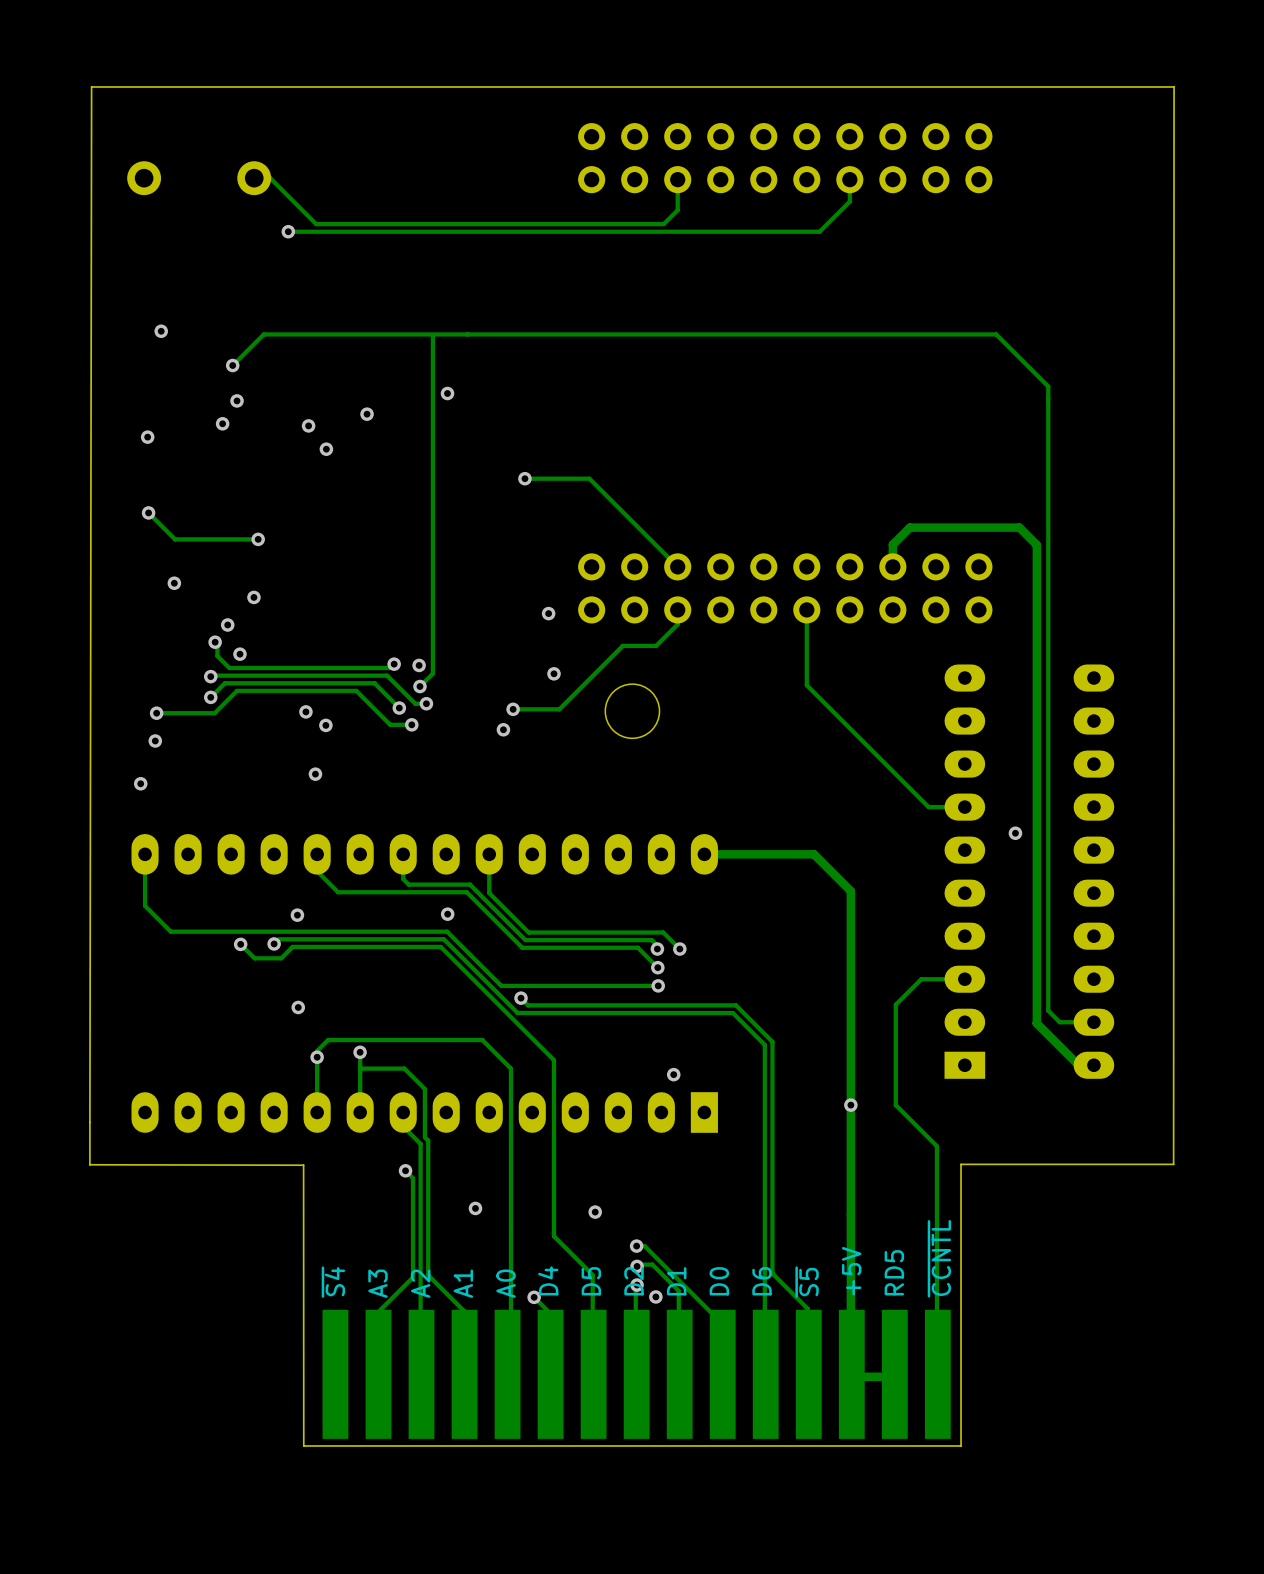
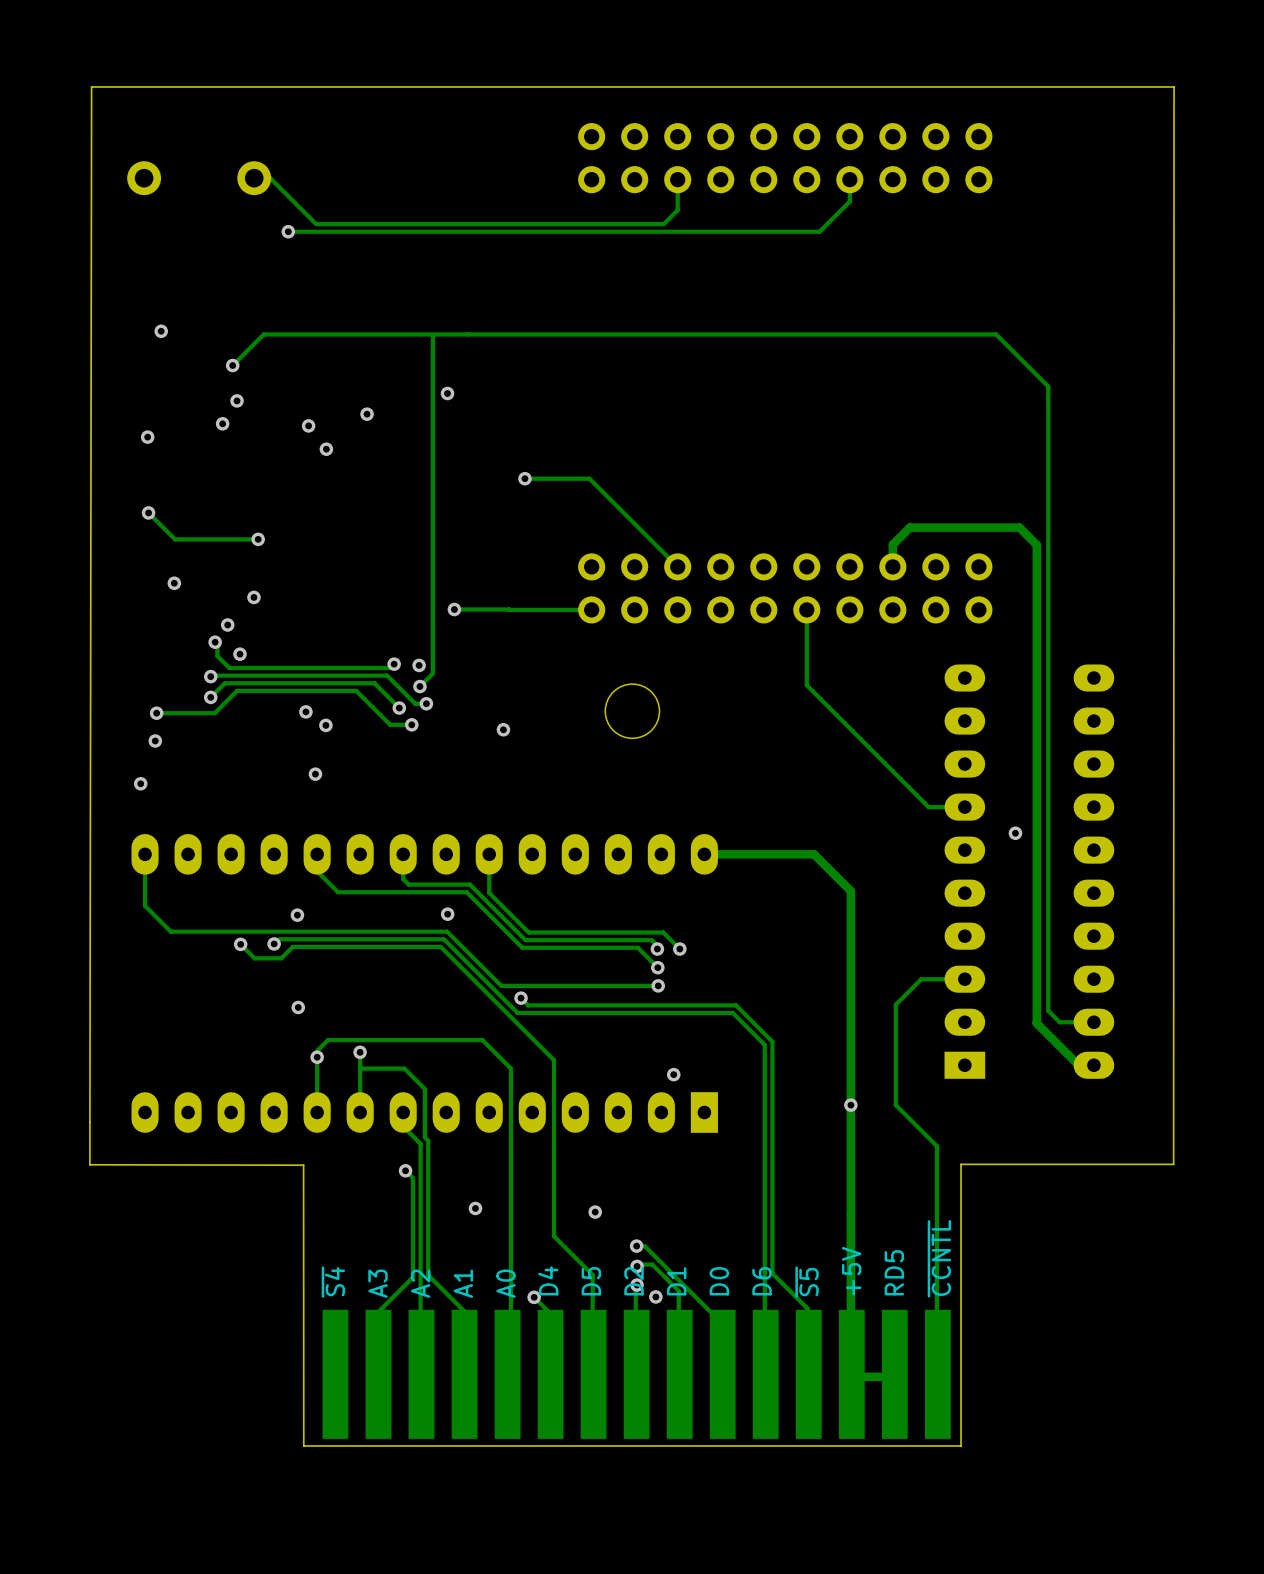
track: none -> (454, 609) (591, 609)
via: none -> (454, 609)
track: (677, 609) (677, 624) (656, 645) (622, 645) (559, 709) (513, 709) -> none
via: (548, 613) -> none
via: (554, 673) -> none
via: (513, 709) -> none

